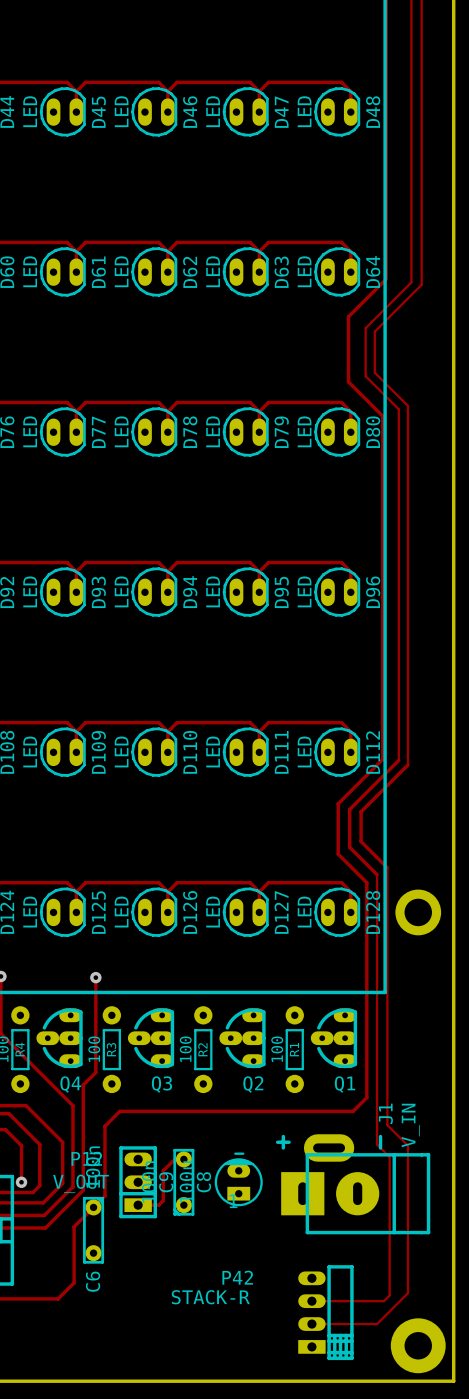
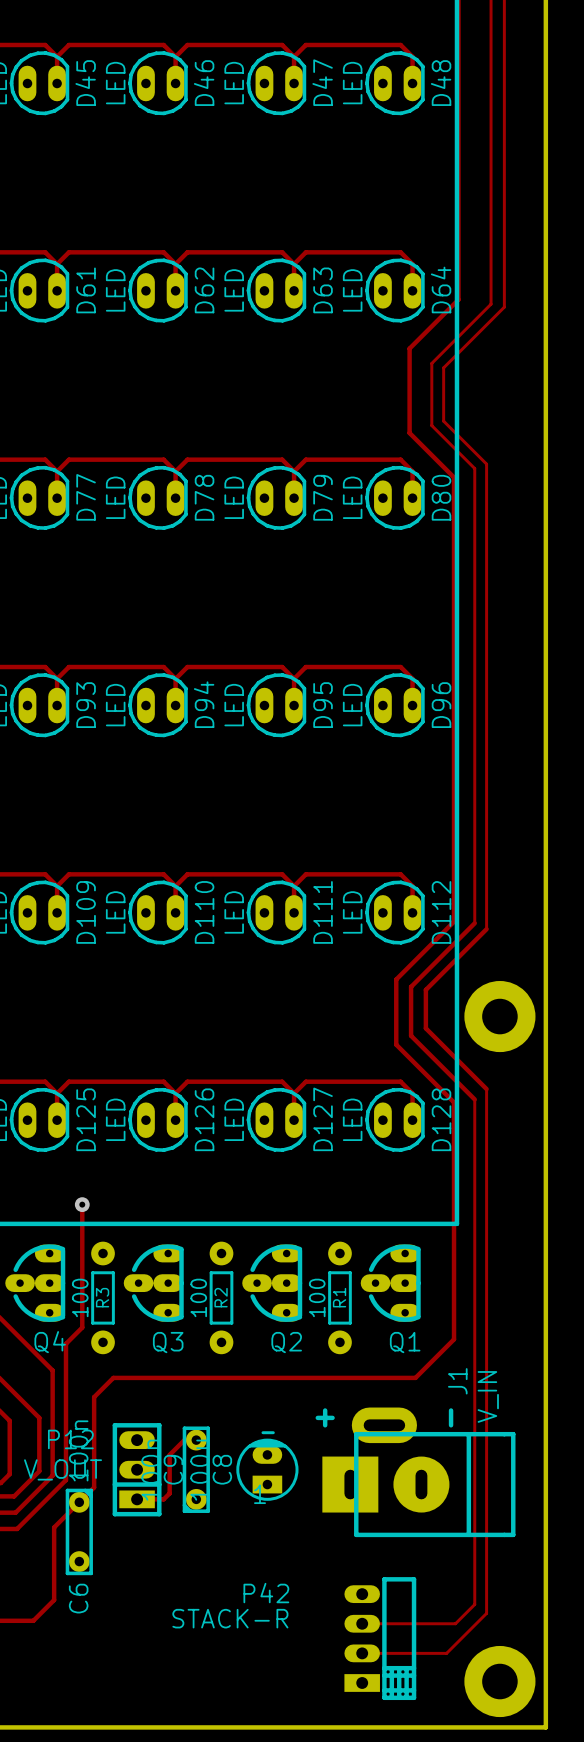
part: none -> (499, 1016)
track: (387, 867) (387, 1125) (407, 1145) -> (459, 1062) (486, 1089) (486, 1422)
track: (377, 874) (377, 1144) (389, 1157) (389, 1295) -> (446, 1071) (474, 1099) (474, 1604) (462, 1616)
track: (366, 882) (366, 1097) -> (433, 1081) (454, 1102) (454, 1339) (433, 1360)
part: (418, 912) -> none

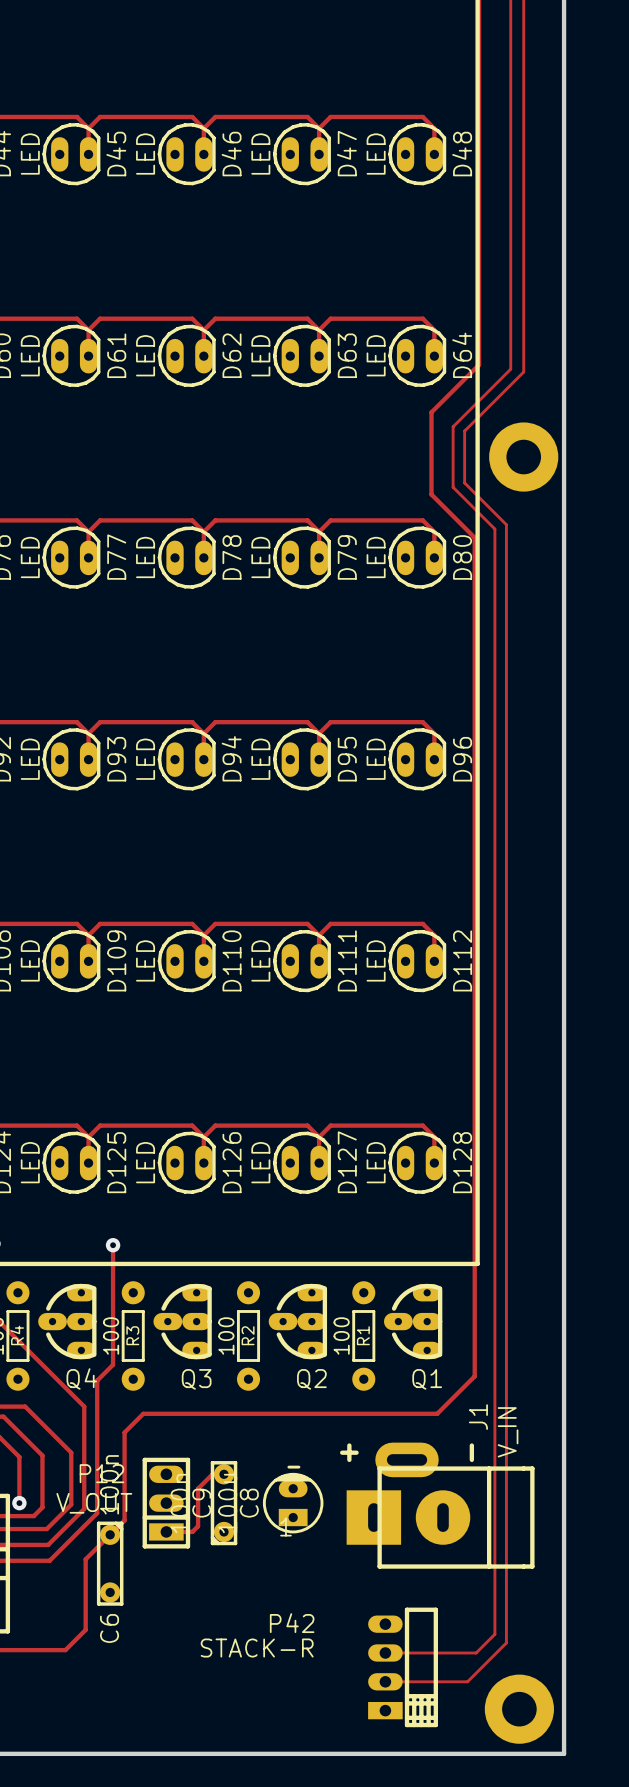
part: none -> (523, 457)
track: (454, 921) (396, 979) (396, 1044) (454, 1102) -> (474, 969) (474, 1145)
track: (474, 923) (411, 986) (411, 1035) (474, 1099) -> (494, 971) (494, 1142)
track: (486, 929) (425, 989) (425, 1028) (486, 1089) -> (506, 977) (506, 1132)
part: (499, 1016) -> none

